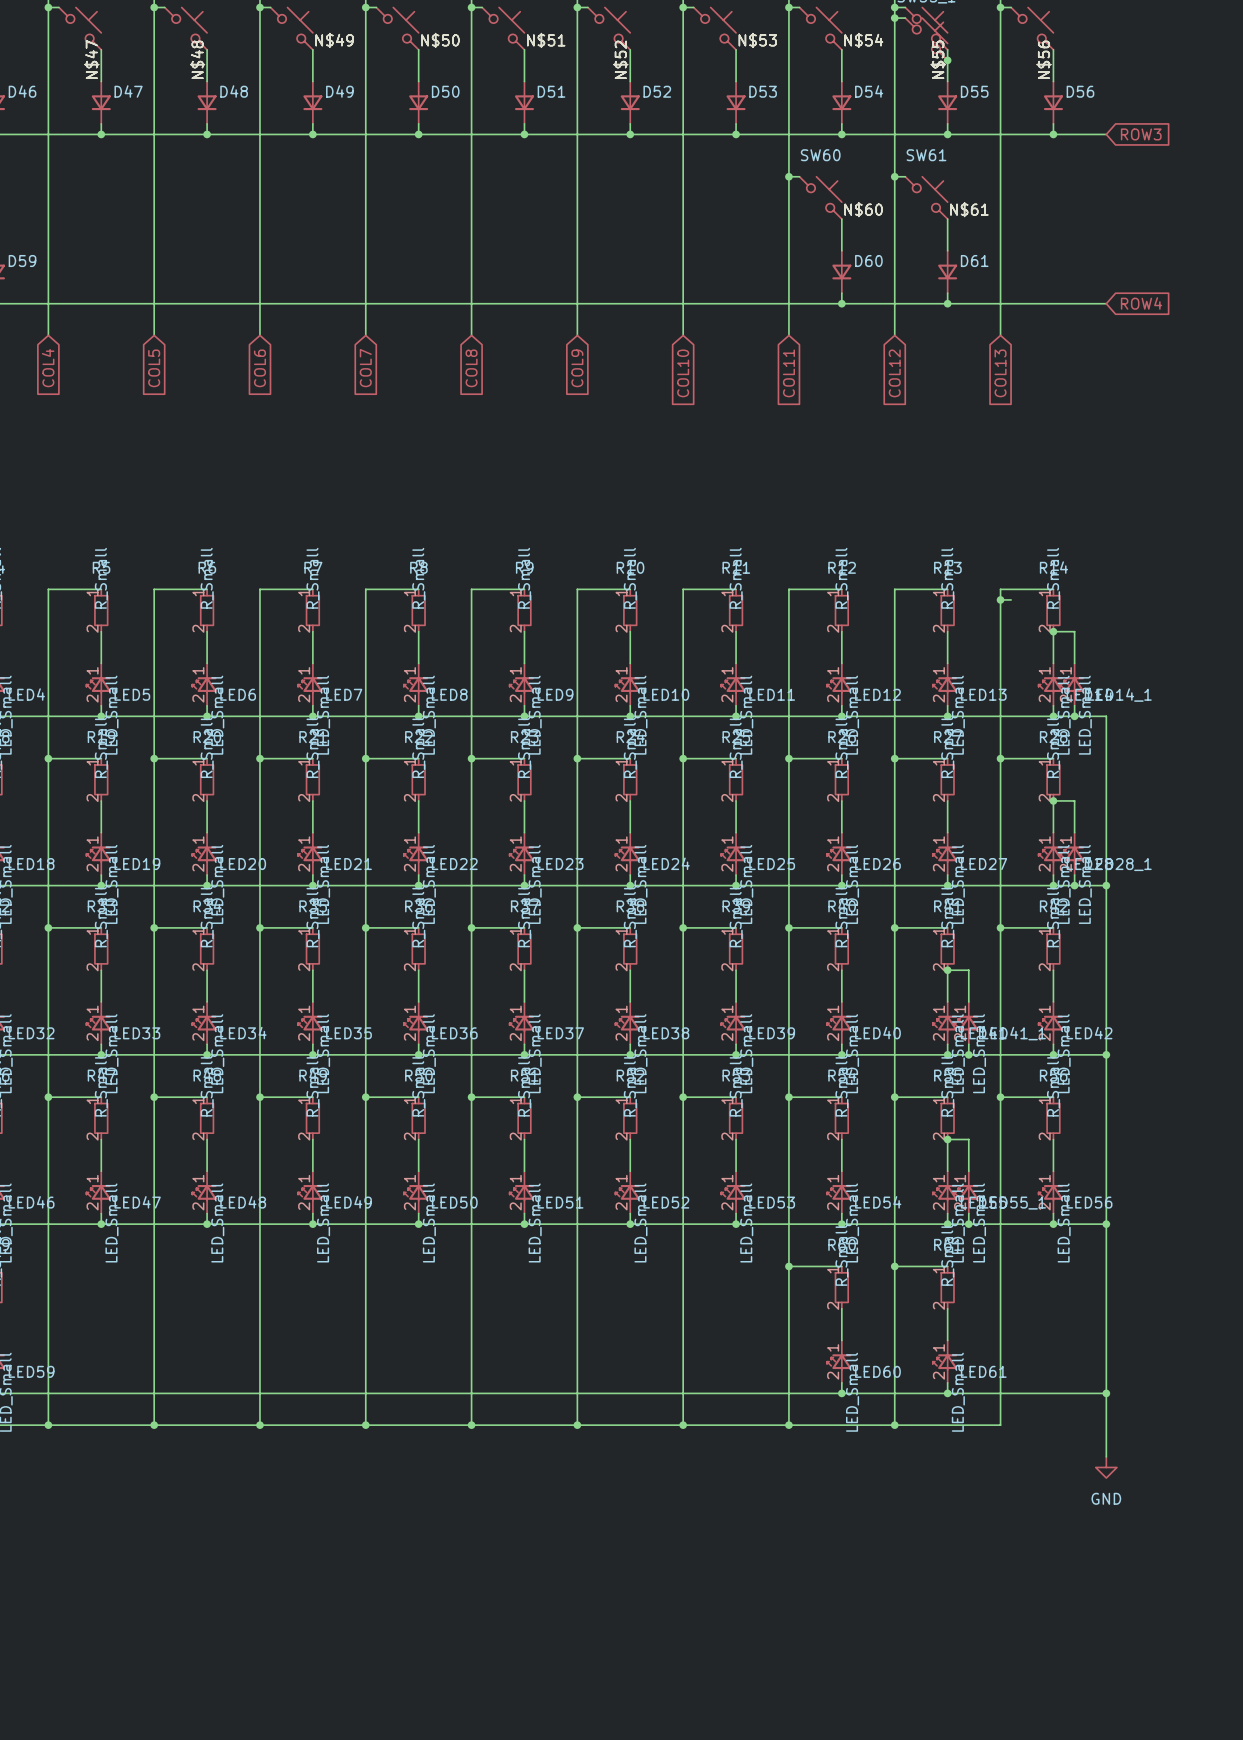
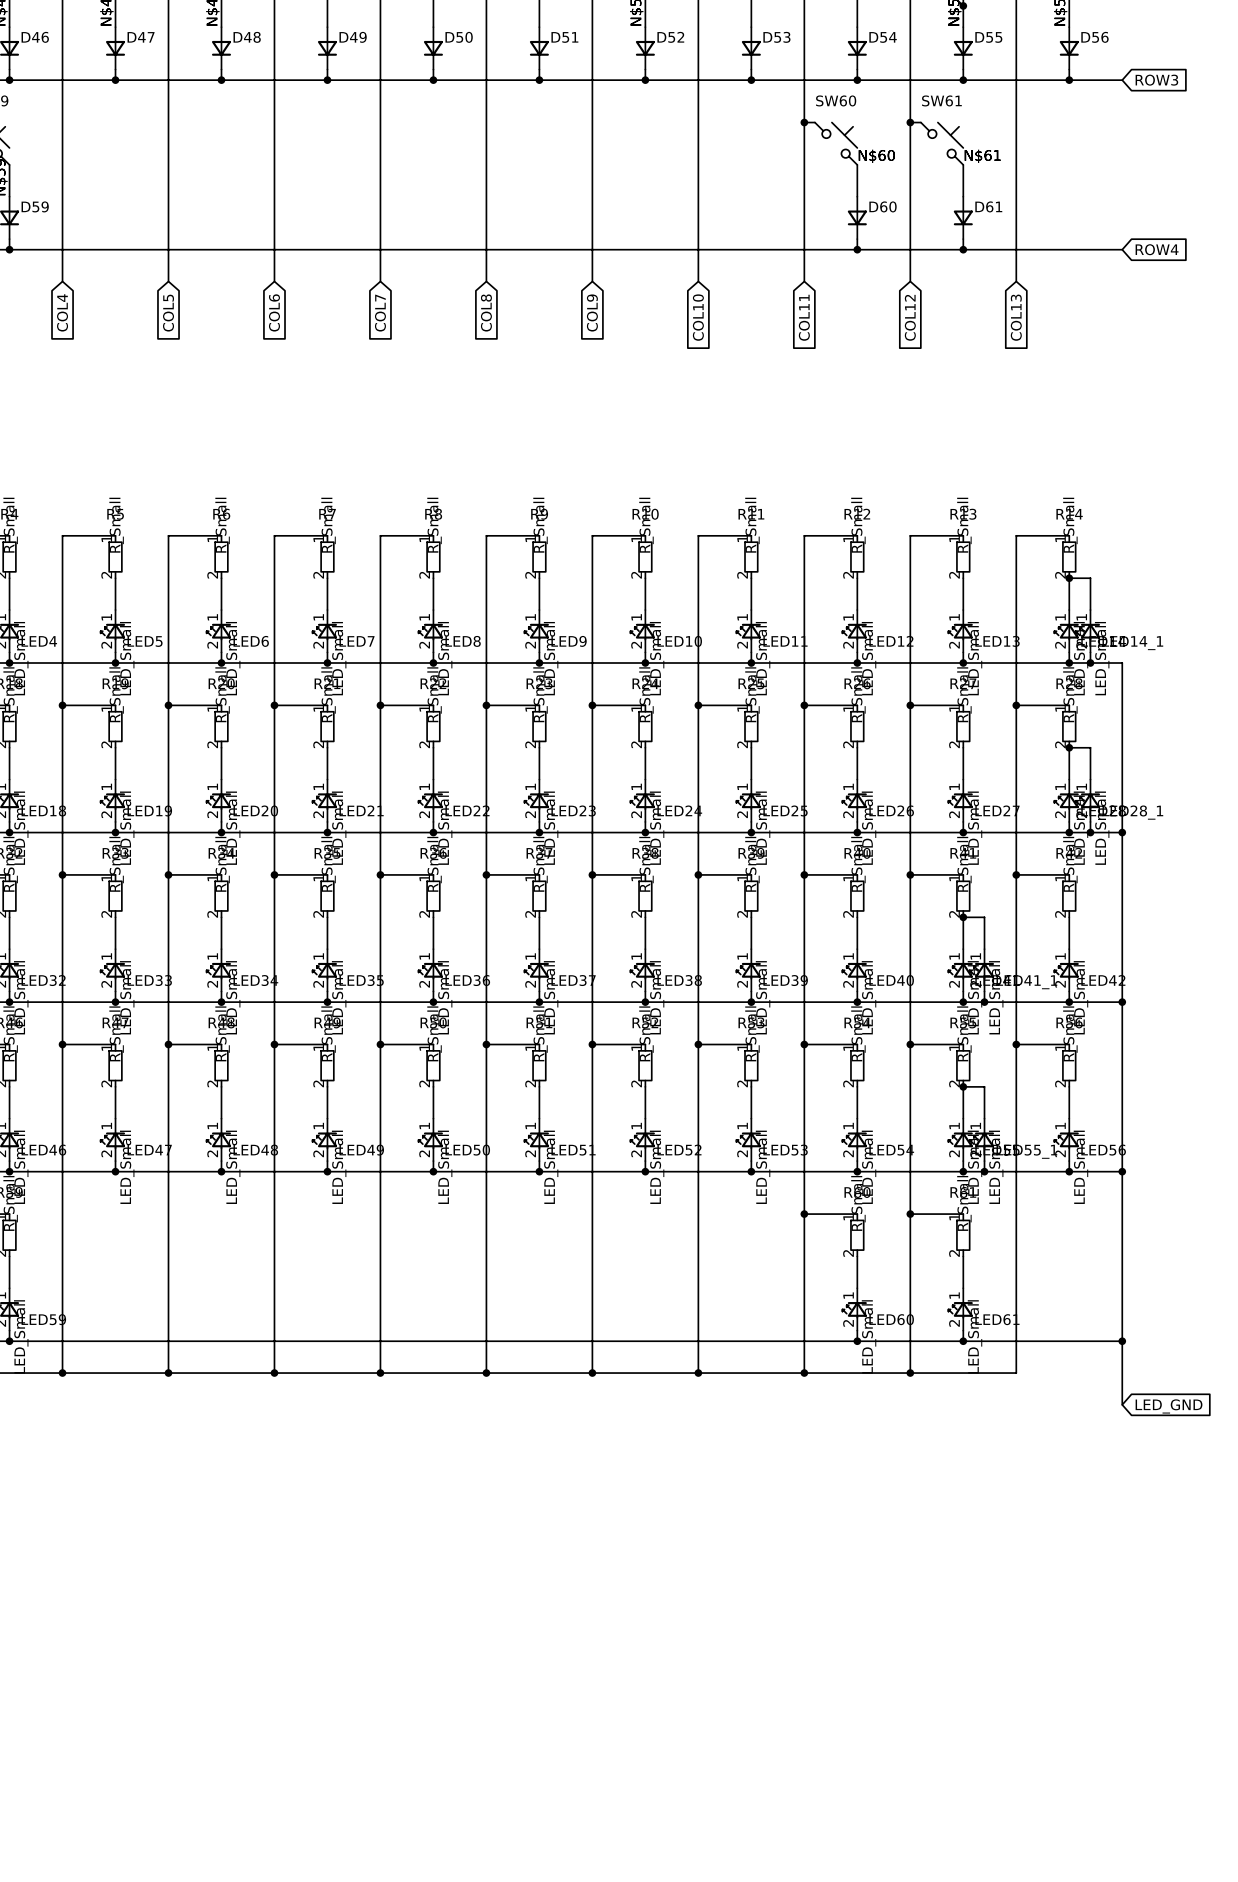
wire: (1000, 599) (1011, 599) -> none
junction: (1000, 599) -> none
global label: none -> LED_GND (1169, 1406)
power symbol: GND (1106, 1467) -> none

